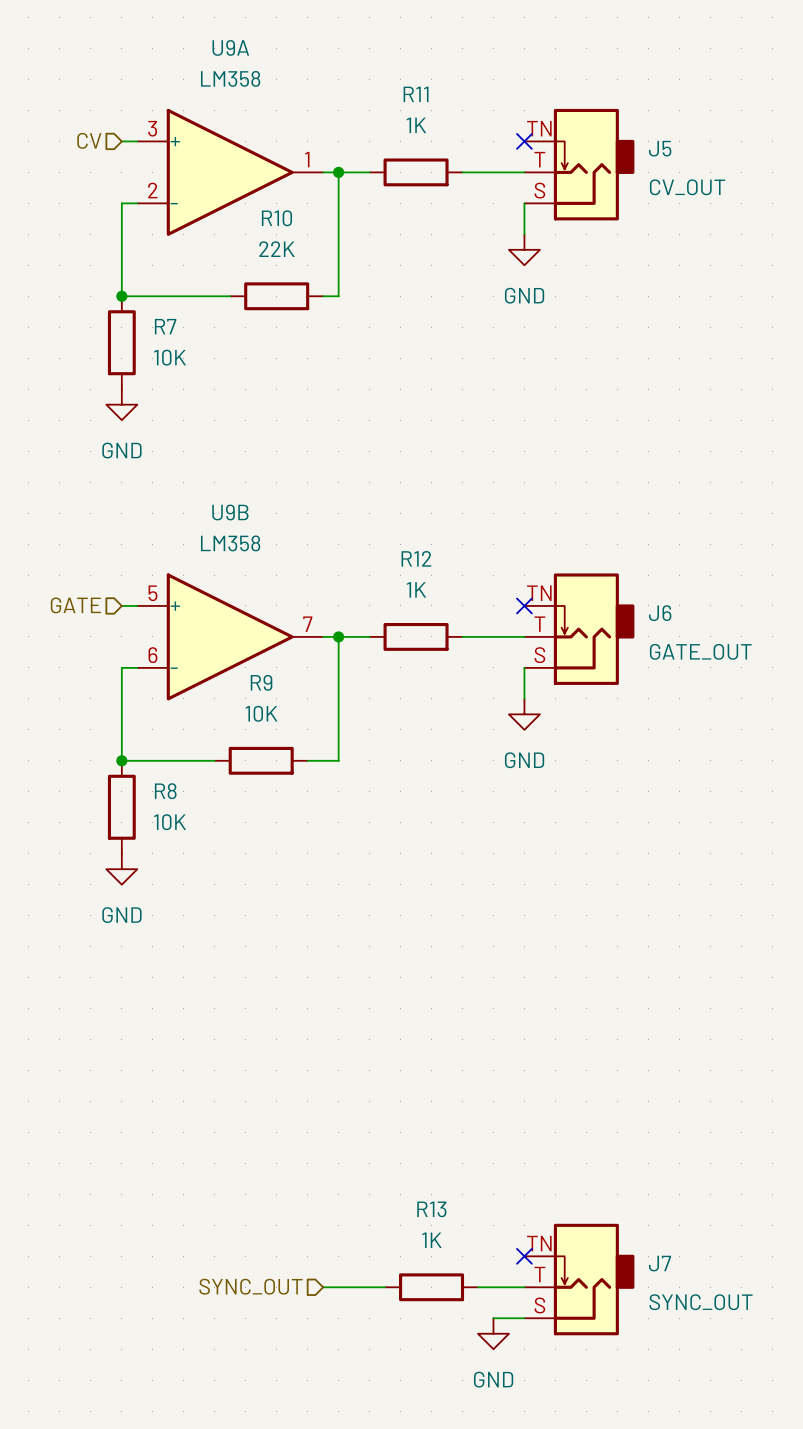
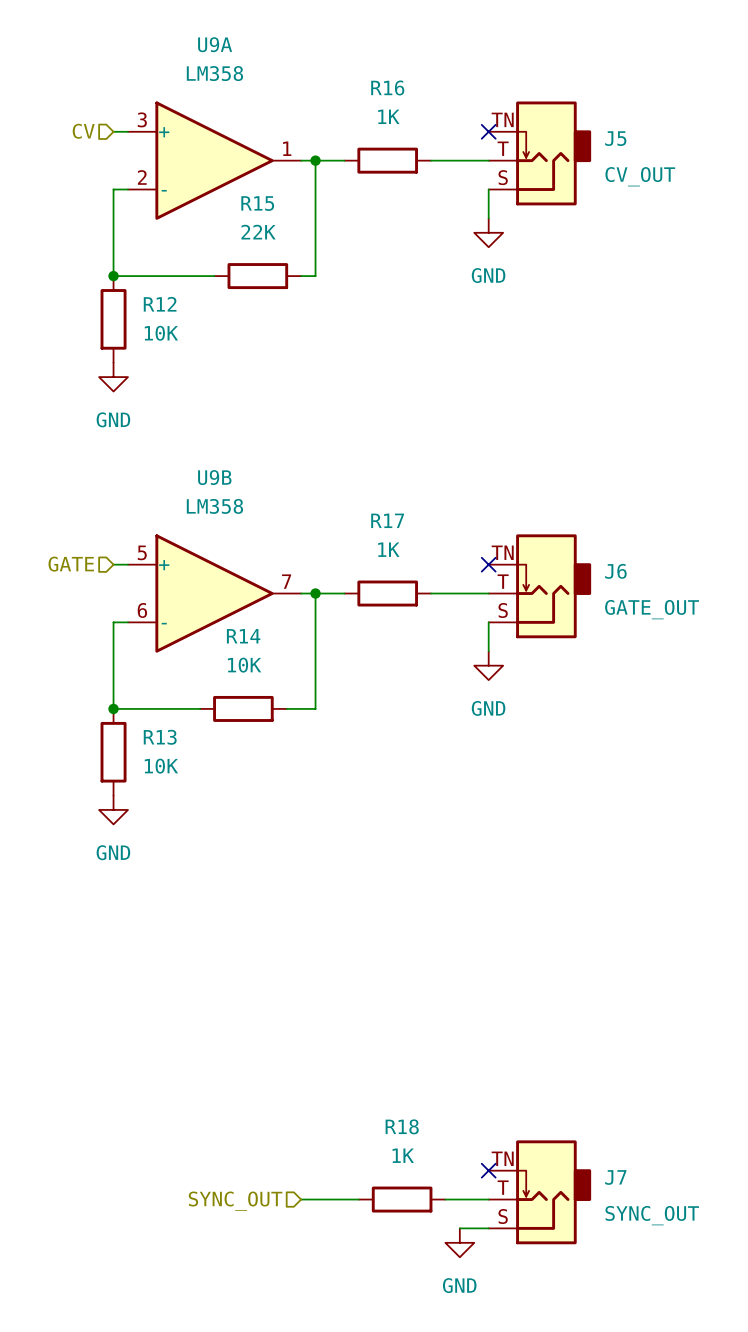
R11 name: R11 (416, 94) -> R16 (387, 87)
R10 name: R10 (276, 218) -> R15 (257, 203)
R7 name: R7 (165, 326) -> R12 (160, 304)
R12 name: R12 (416, 558) -> R17 (387, 520)
R9 name: R9 (261, 682) -> R14 (243, 636)
R8 name: R8 (165, 791) -> R13 (160, 737)
R13 name: R13 (431, 1209) -> R18 (402, 1126)

